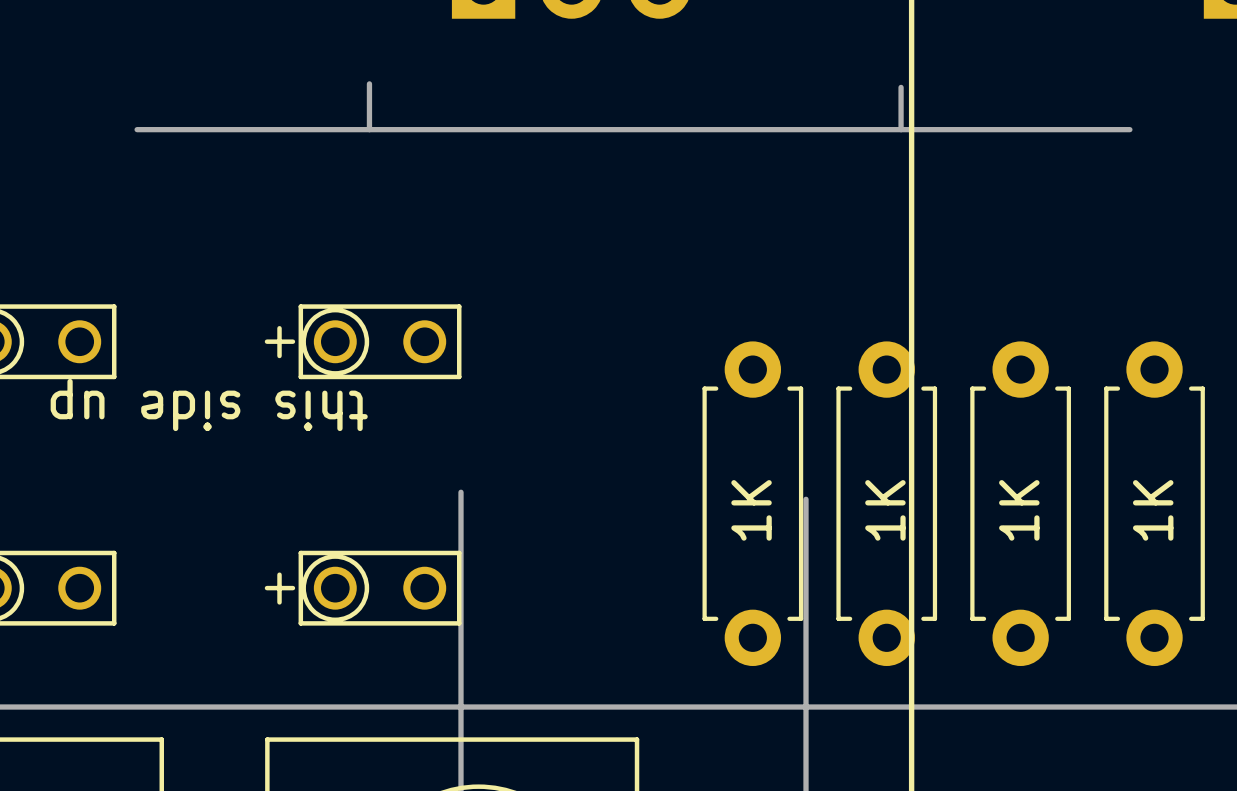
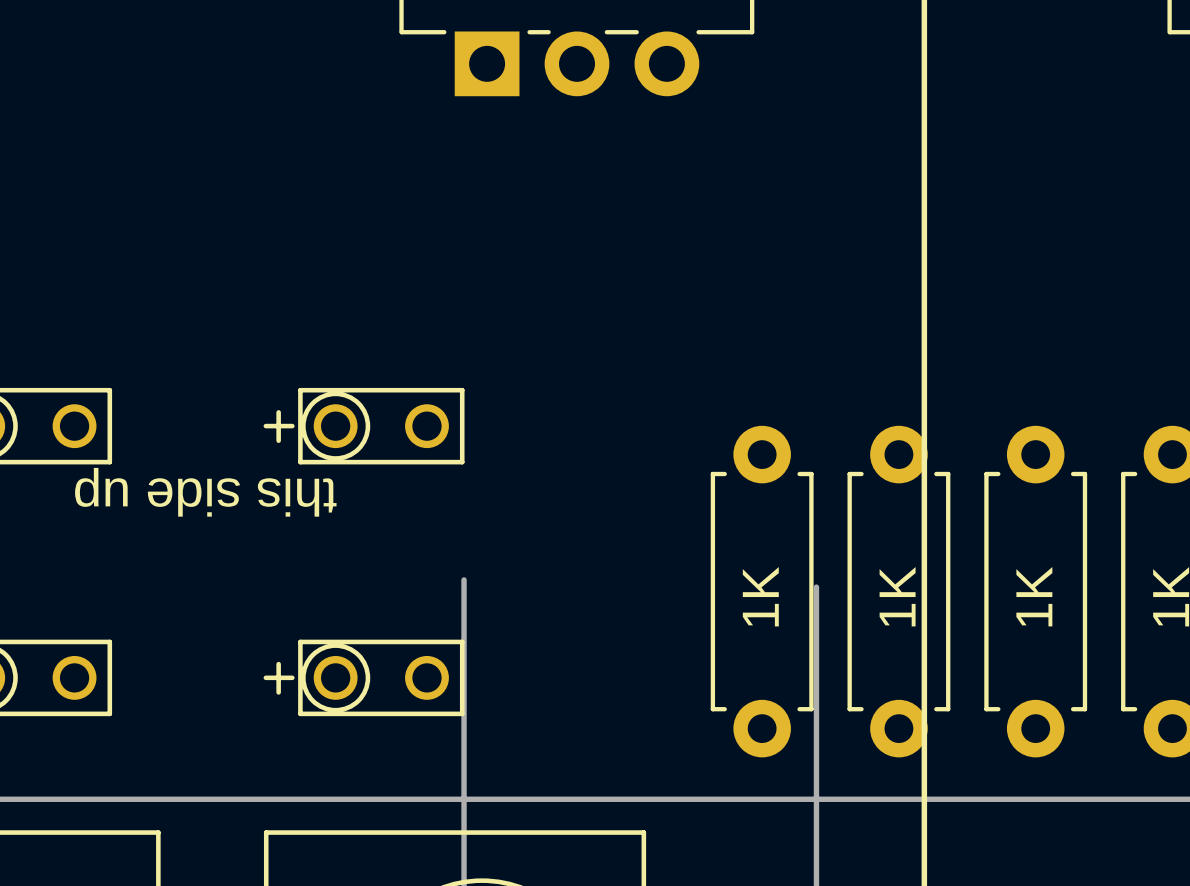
line: (369, 83) (369, 129) -> none
line: (901, 87) (901, 129) -> none
line: (137, 129) (1129, 129) -> none

